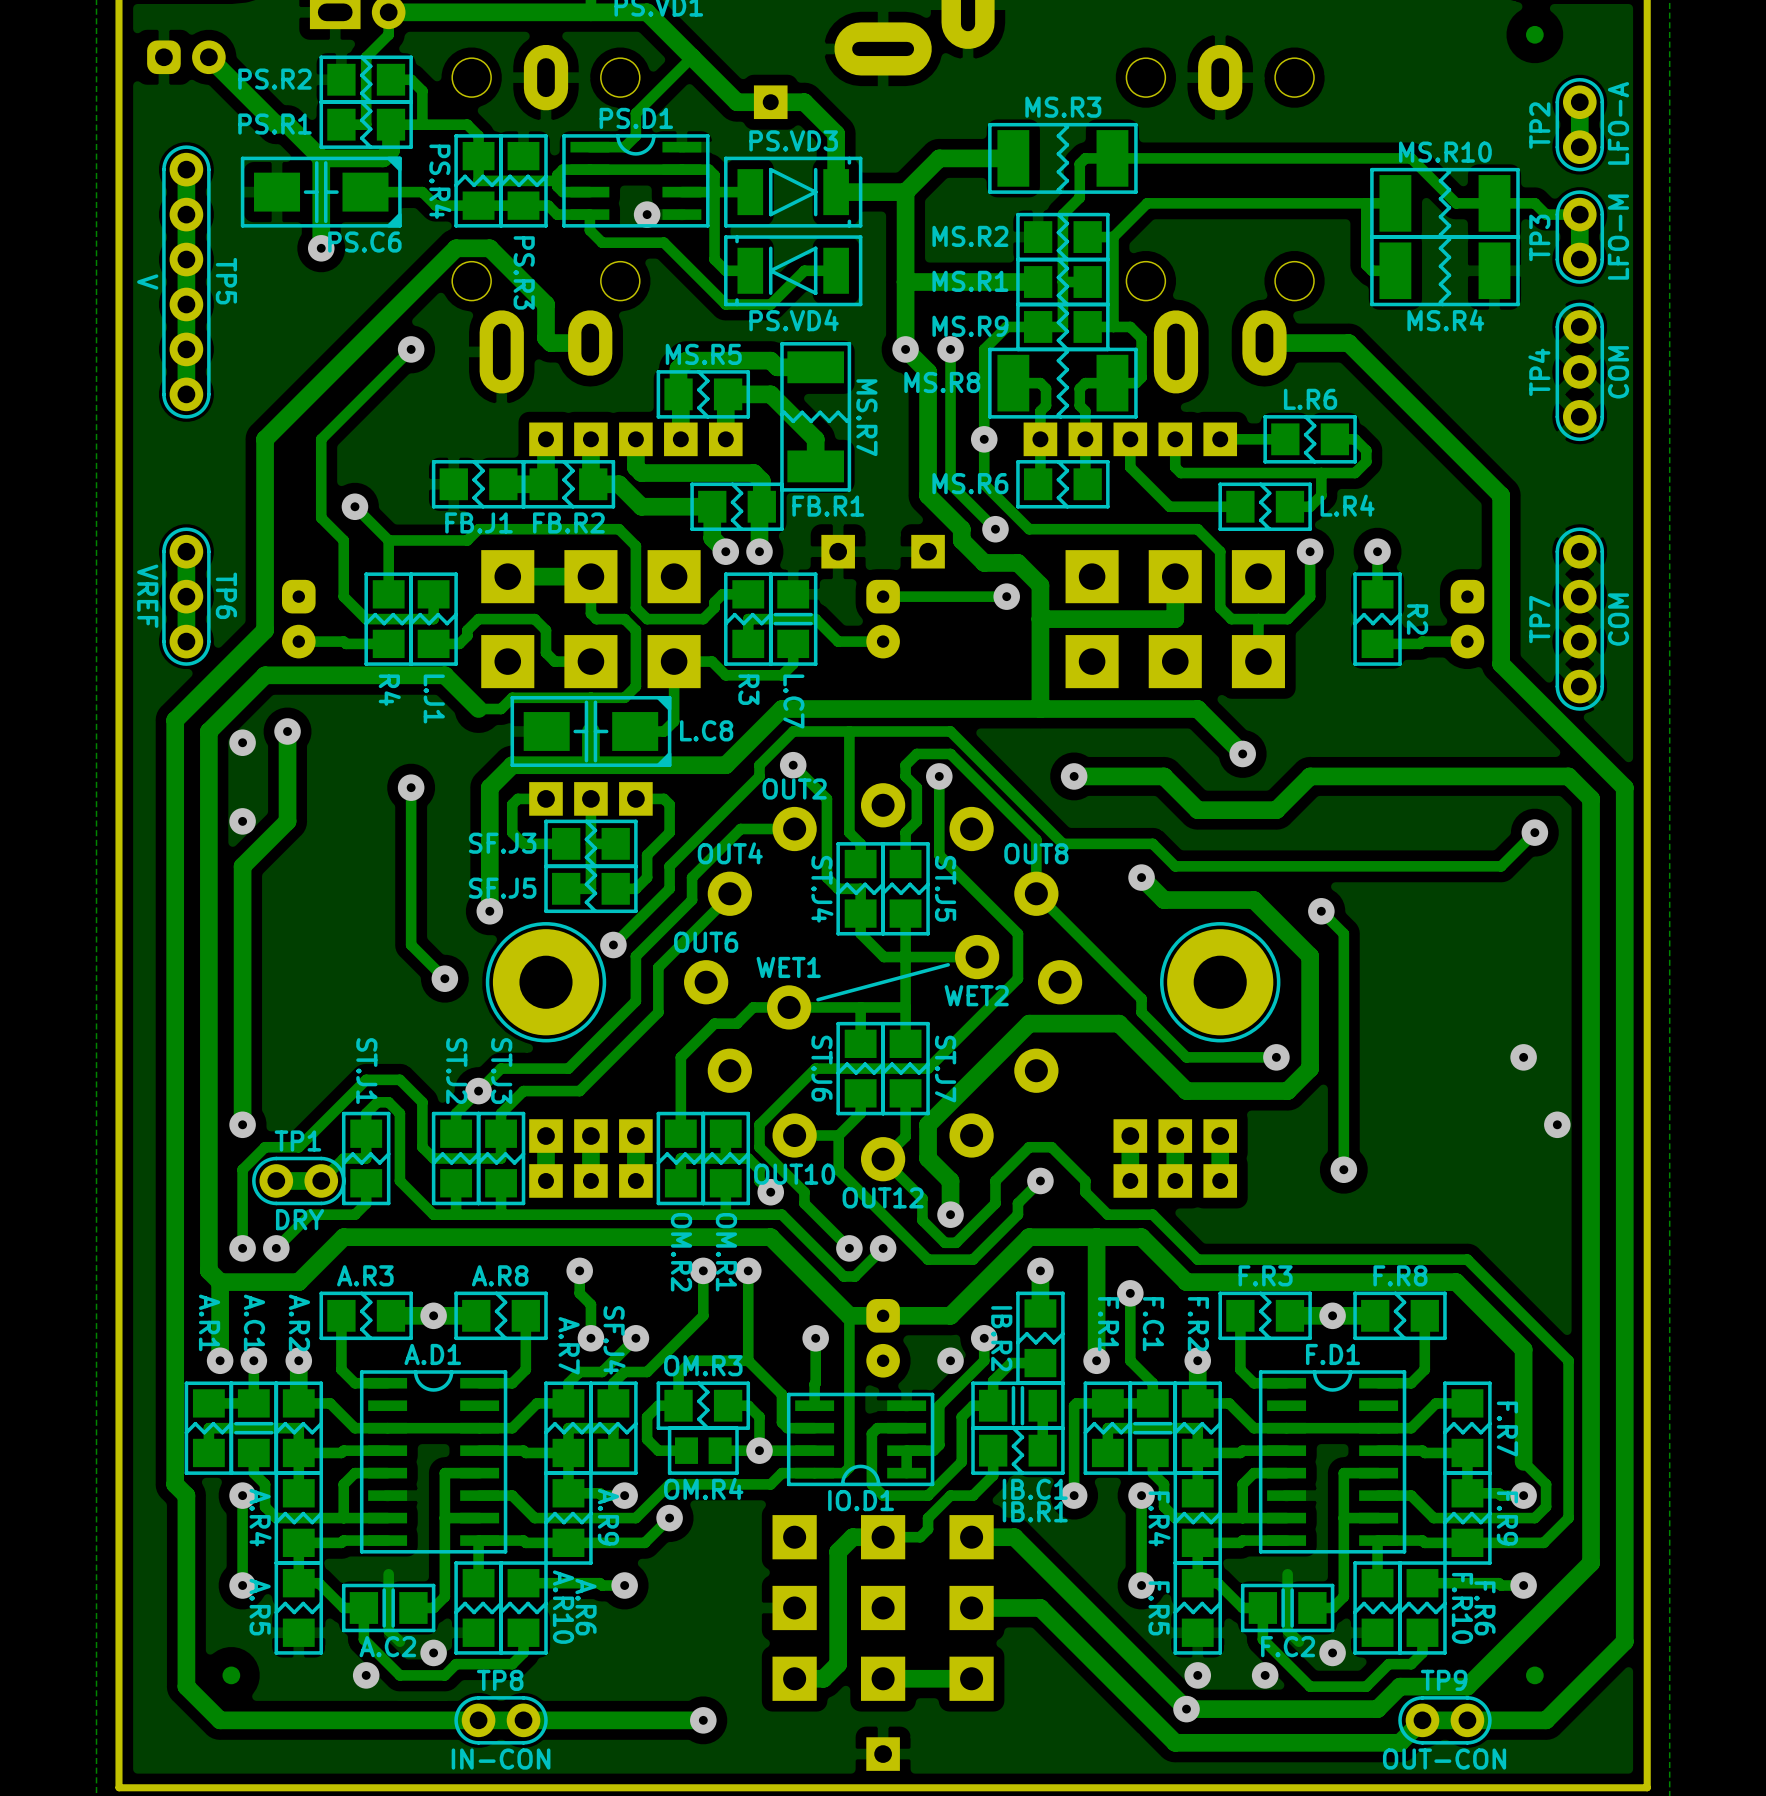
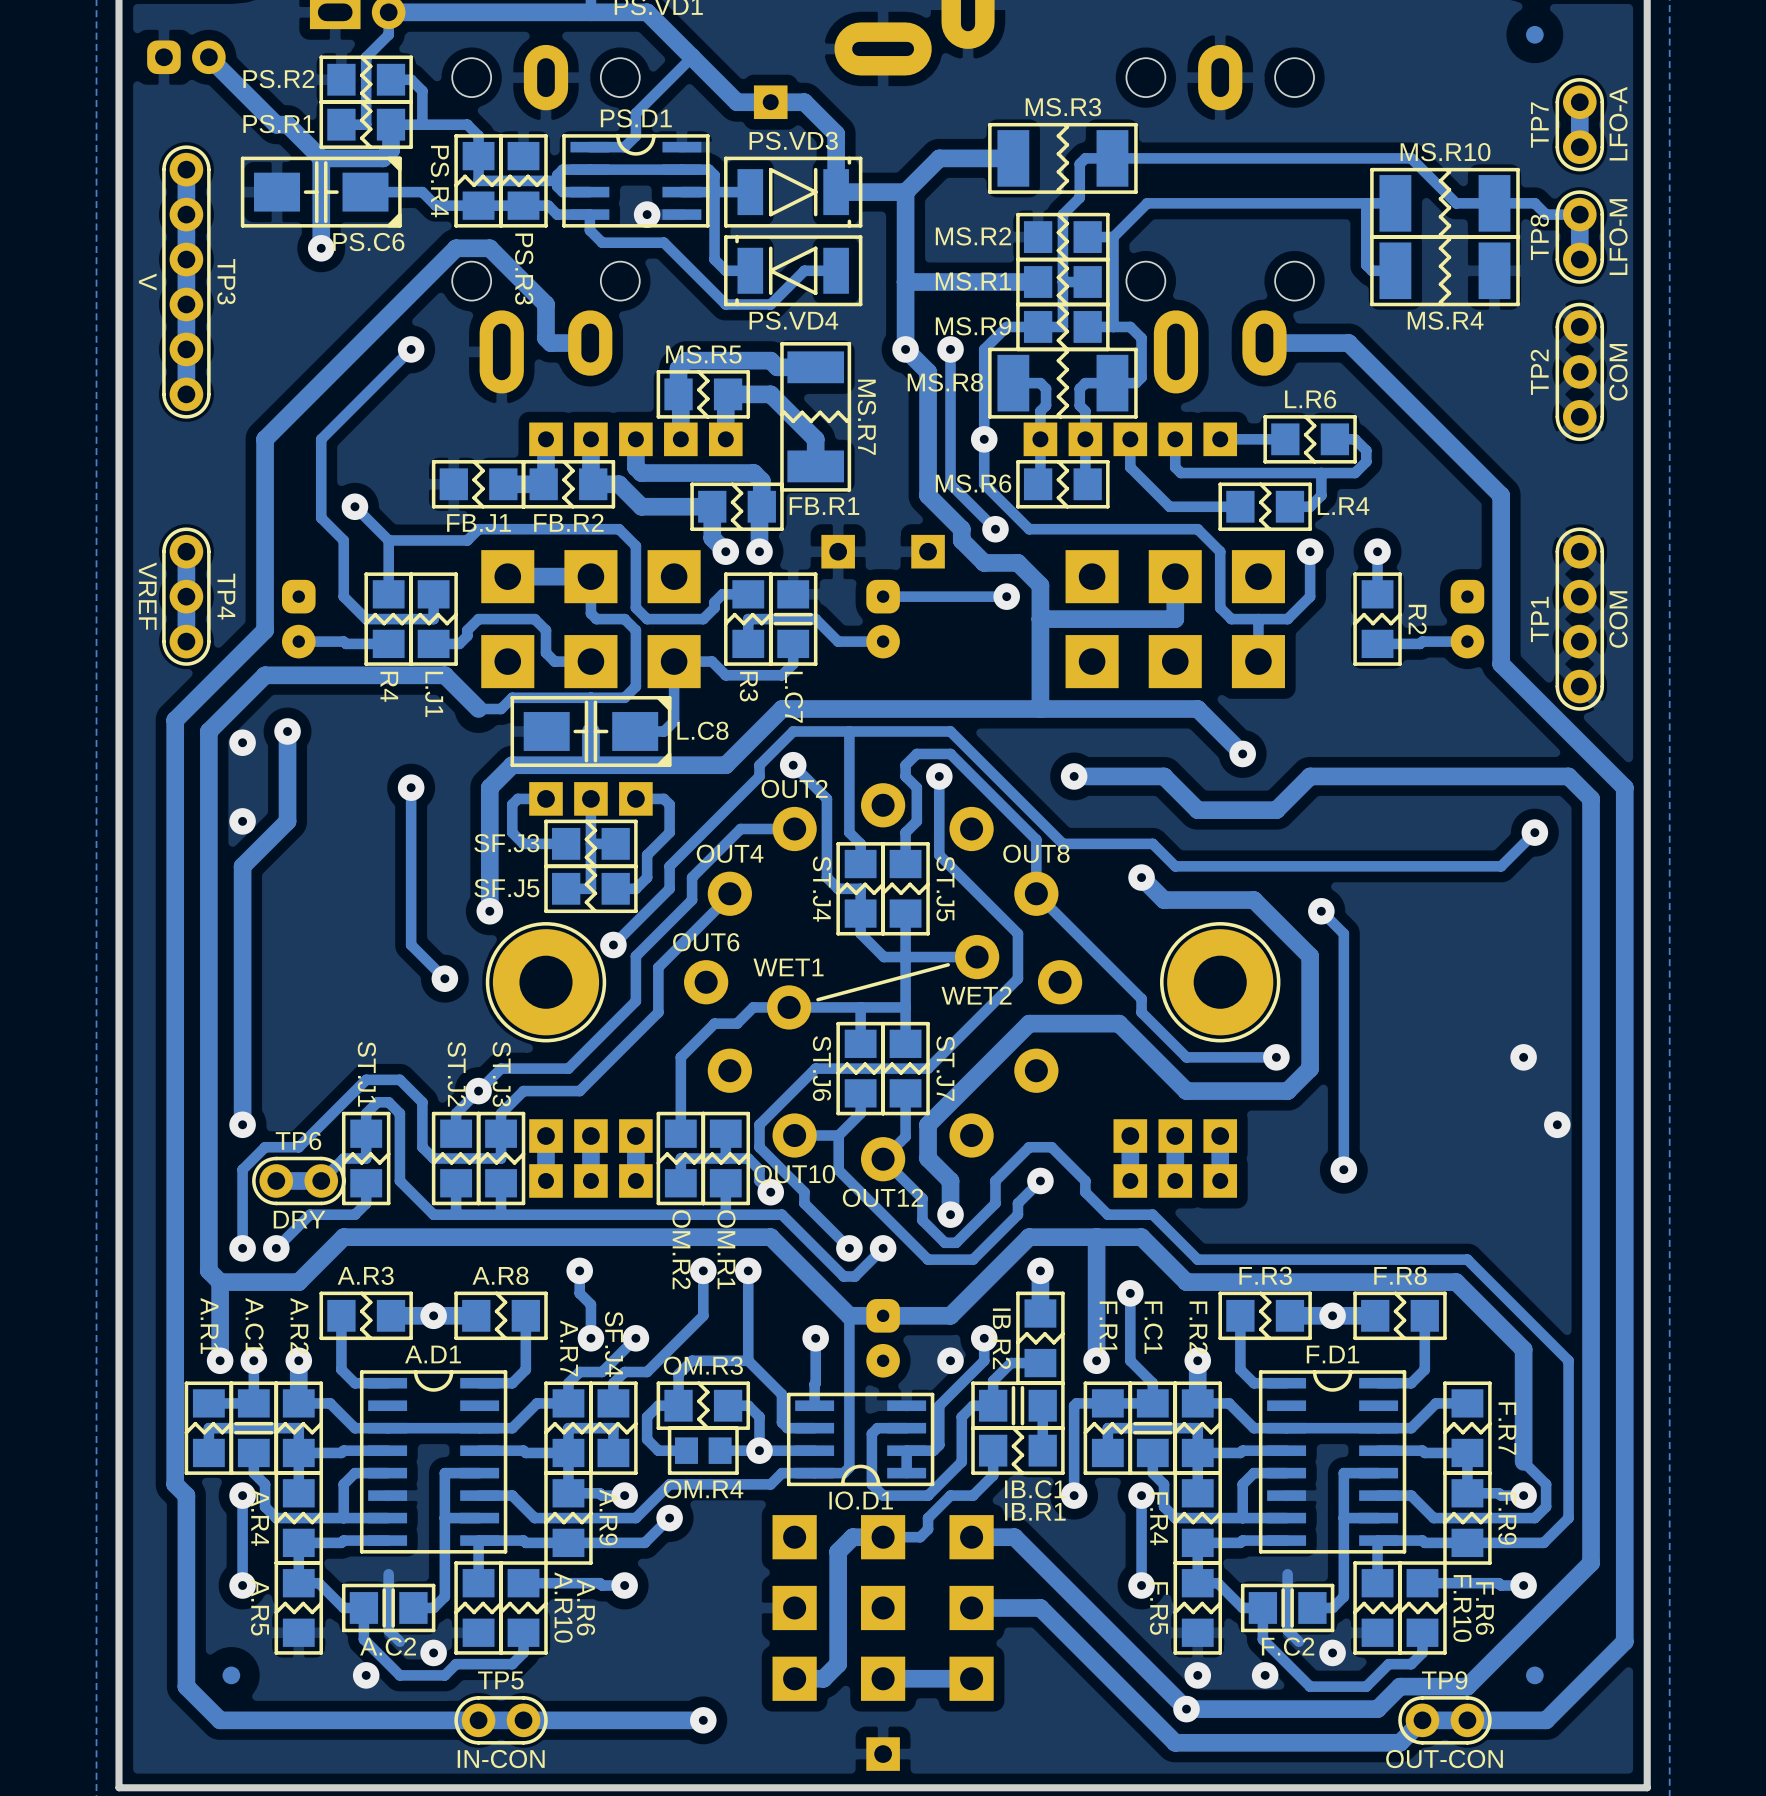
TP2 name: TP2 (1539, 125) -> TP7 (1539, 125)
TP3 name: TP3 (1539, 237) -> TP8 (1539, 237)
TP5 name: TP5 (226, 281) -> TP3 (226, 281)
TP4 name: TP4 (1539, 372) -> TP2 (1539, 372)
TP6 name: TP6 (226, 595) -> TP4 (226, 596)
TP7 name: TP7 (1539, 619) -> TP1 (1539, 619)
TP1 name: TP1 (297, 1140) -> TP6 (298, 1140)
TP8 name: TP8 (500, 1680) -> TP5 (500, 1680)

